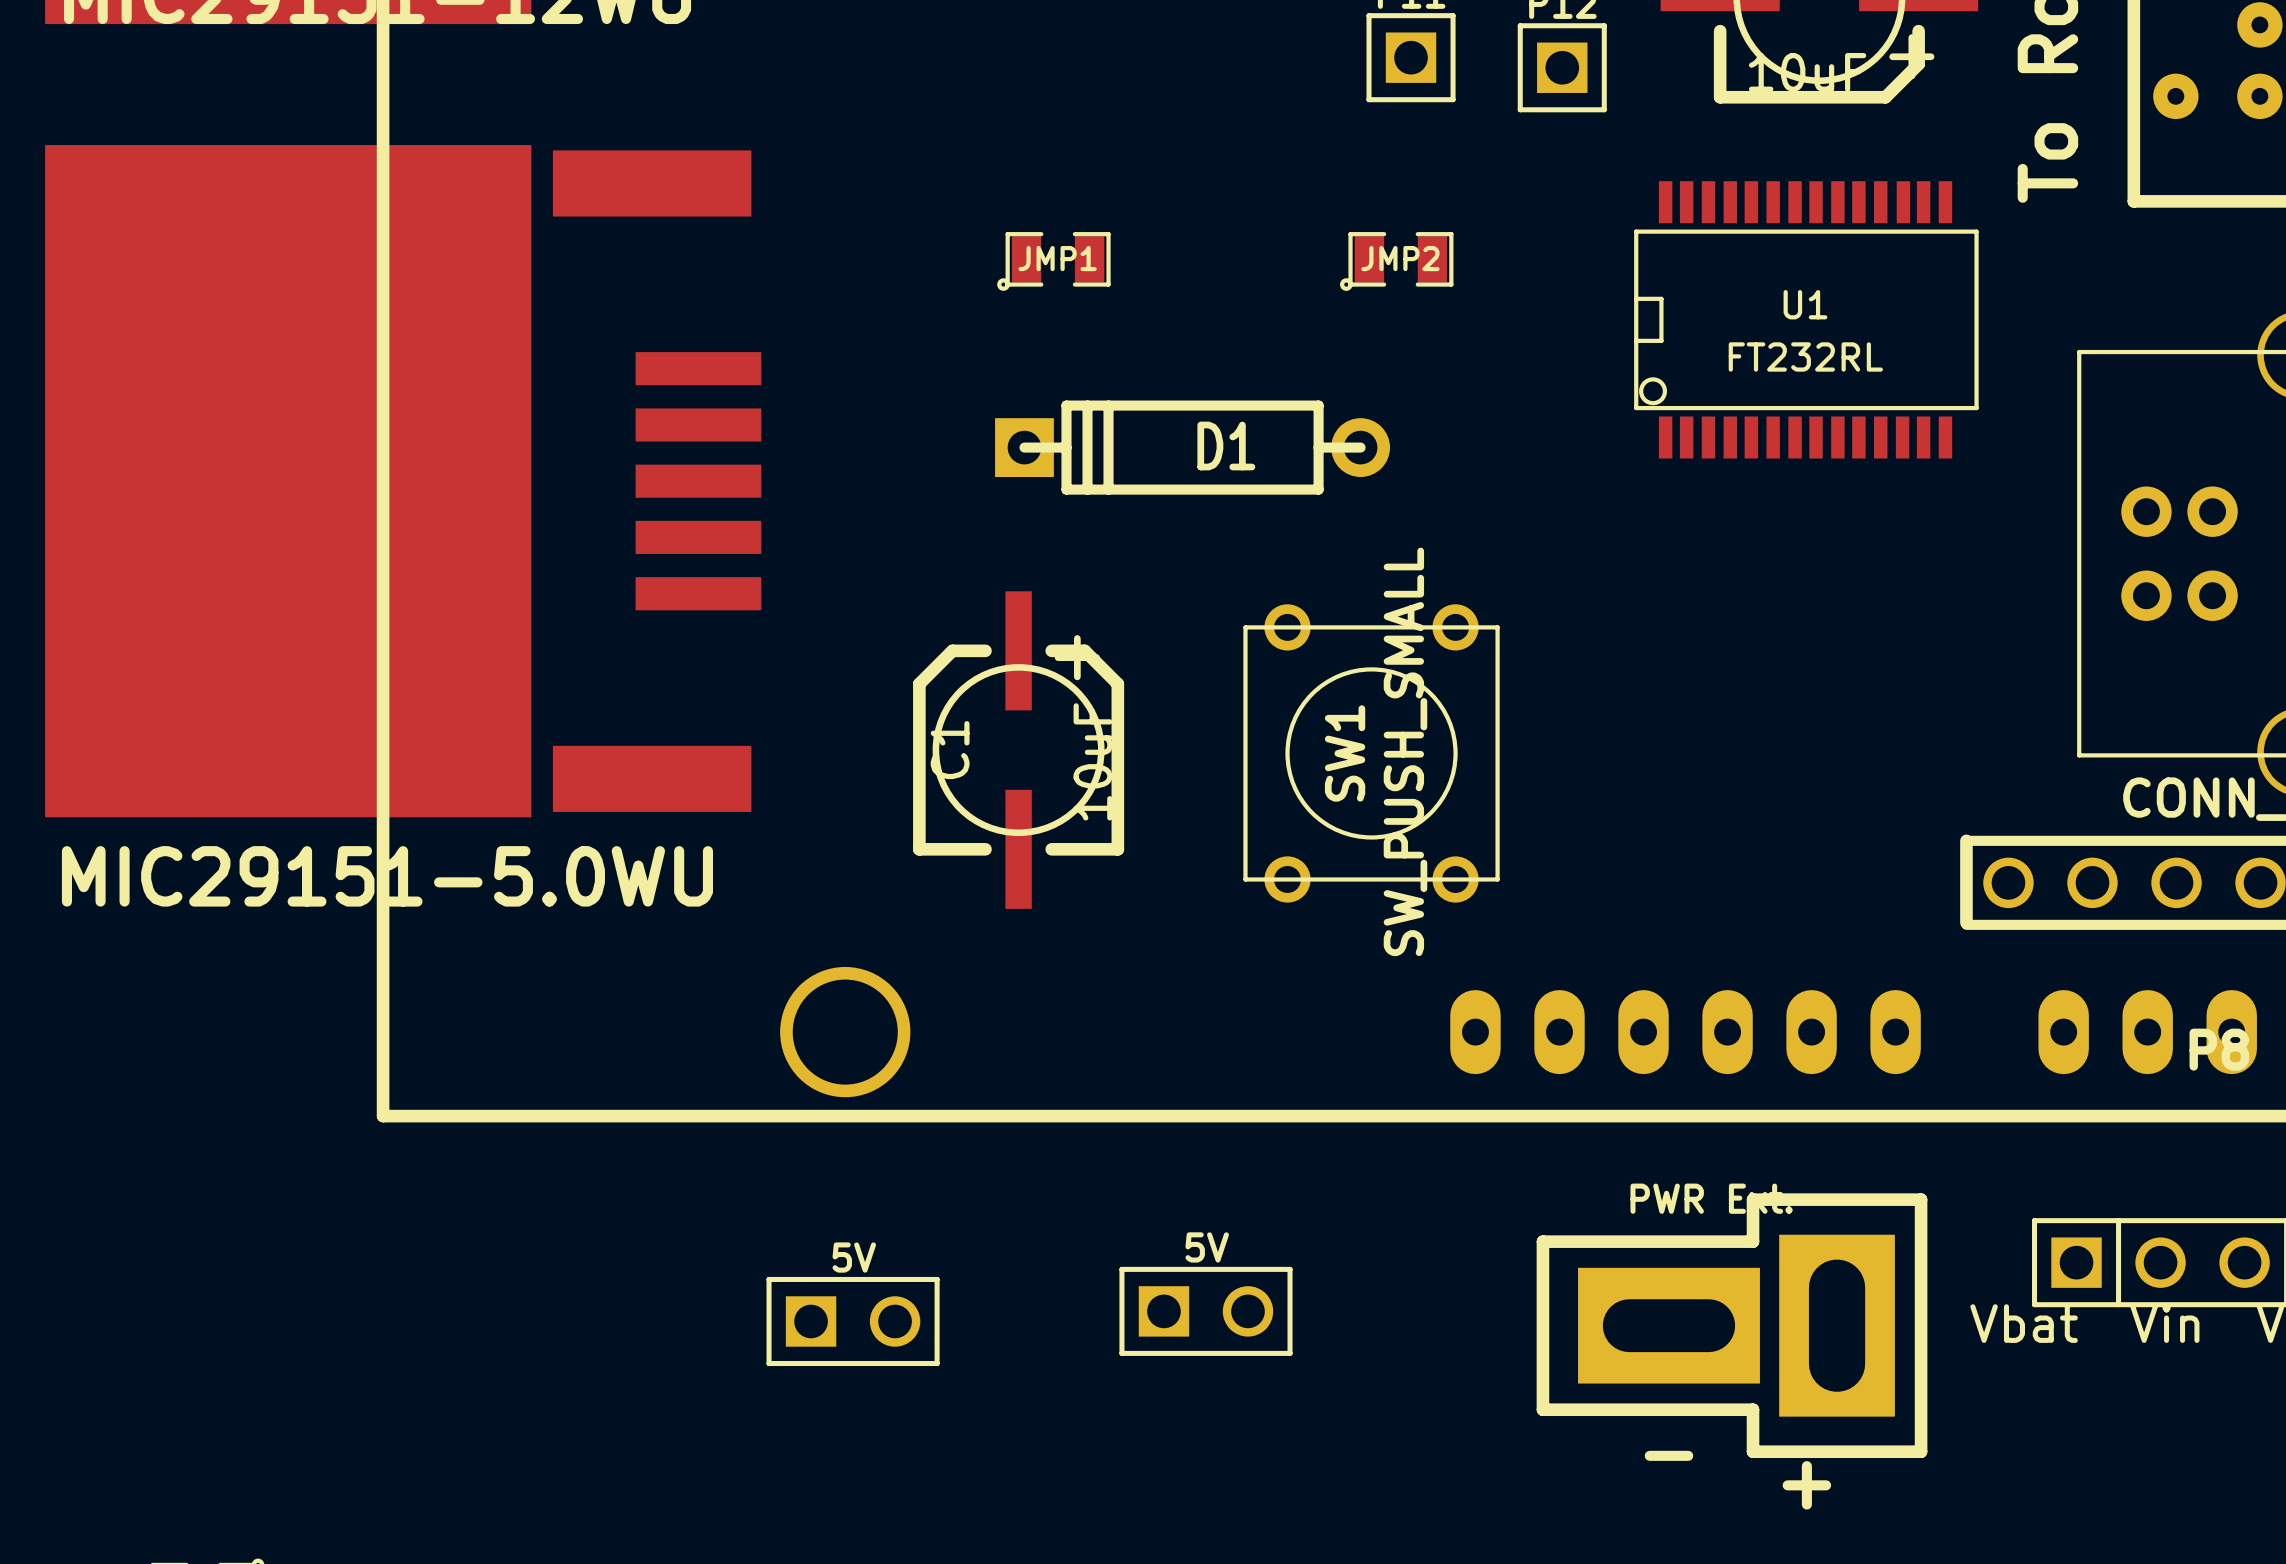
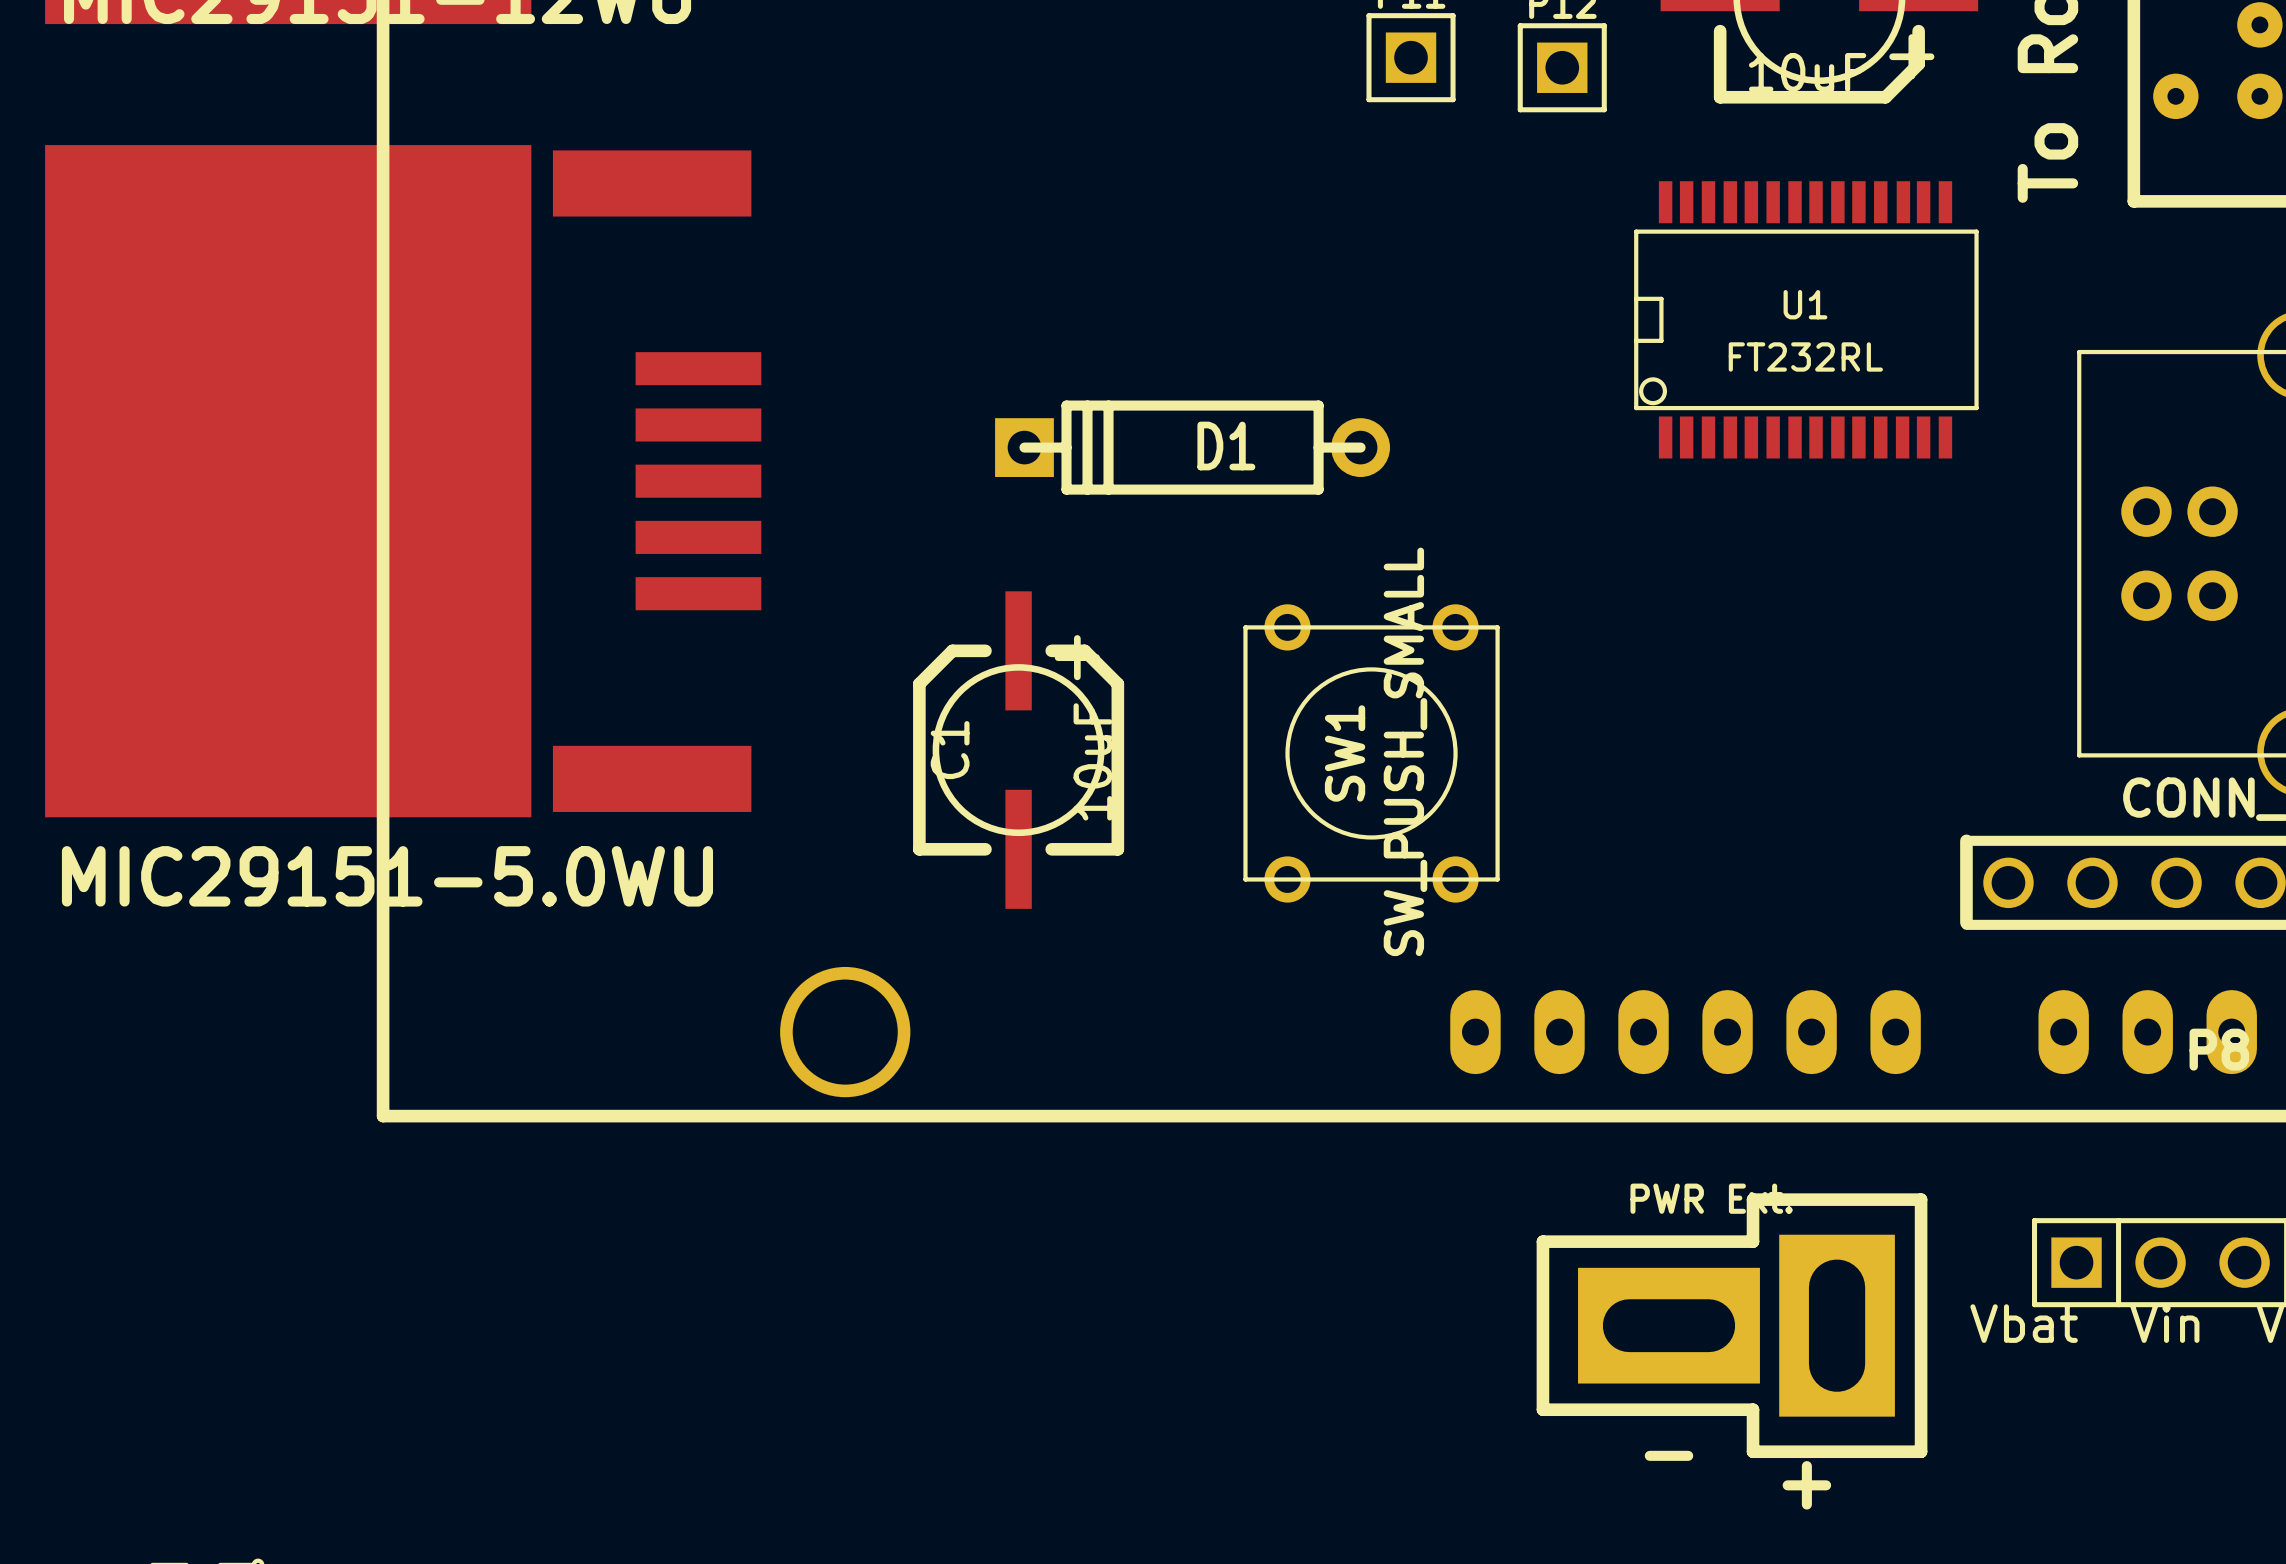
JMP1: (1053, 261) -> none
JMP2: (1396, 261) -> none
5V: (1205, 1311) -> none
5V: (853, 1321) -> none

